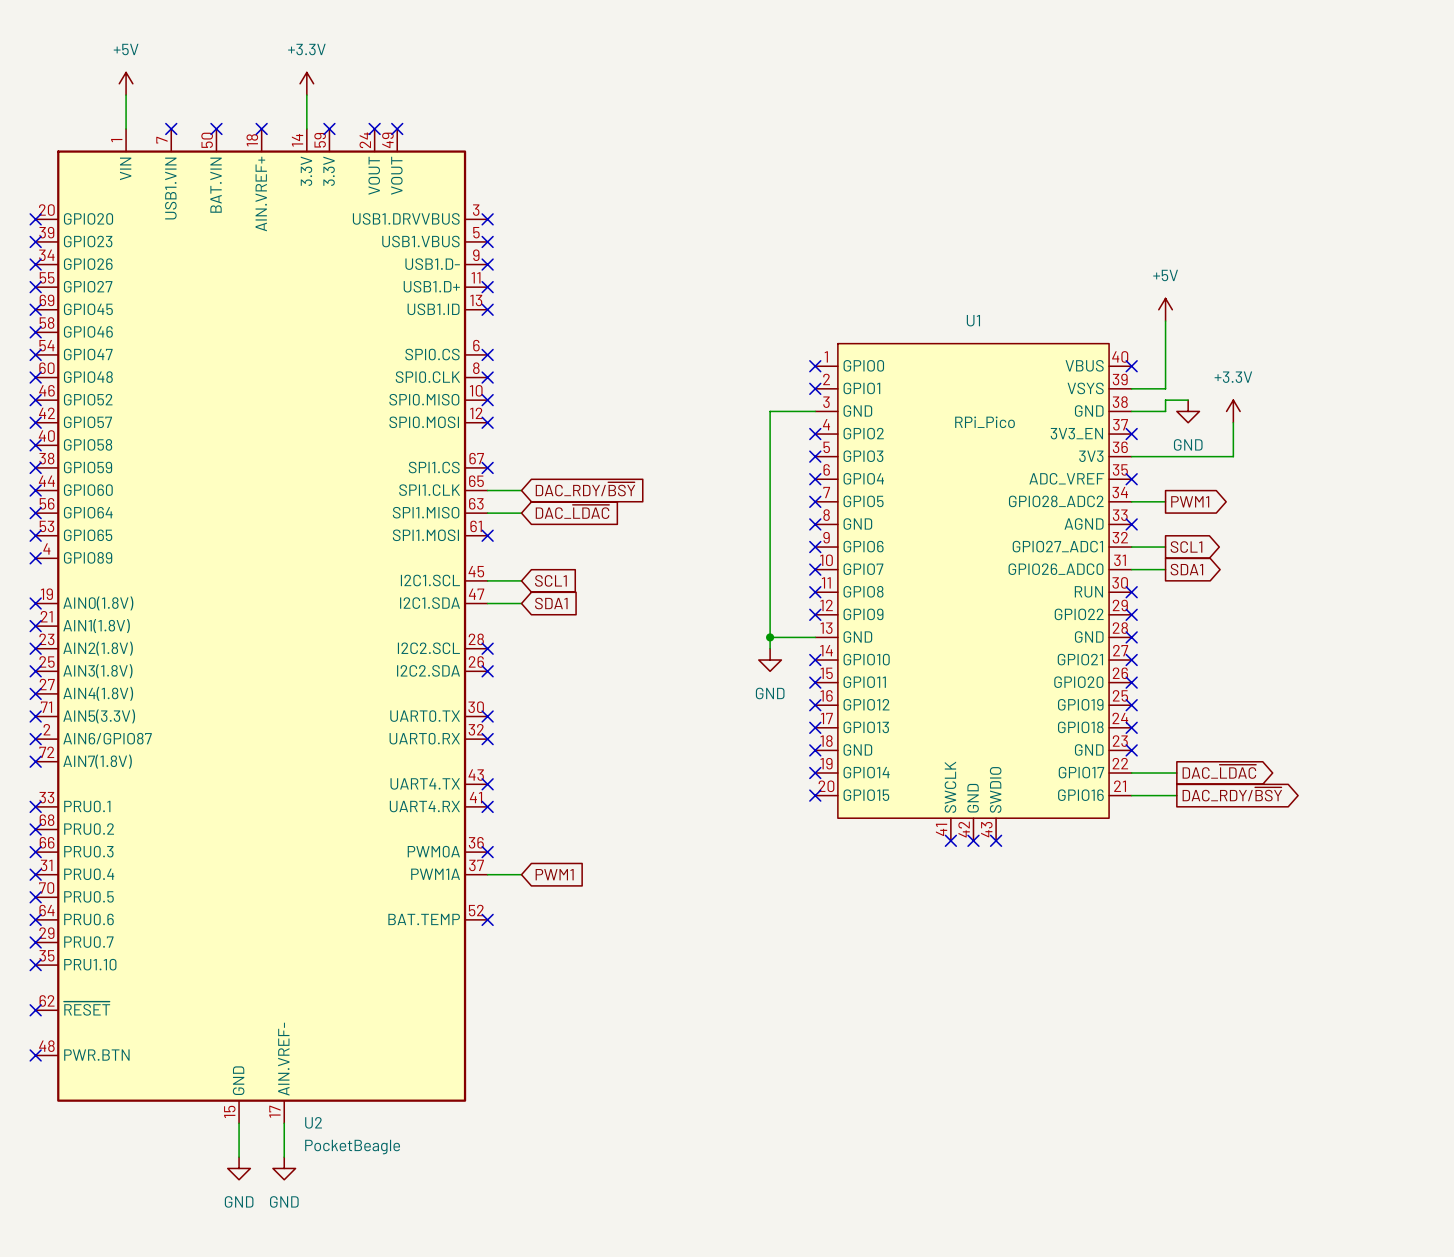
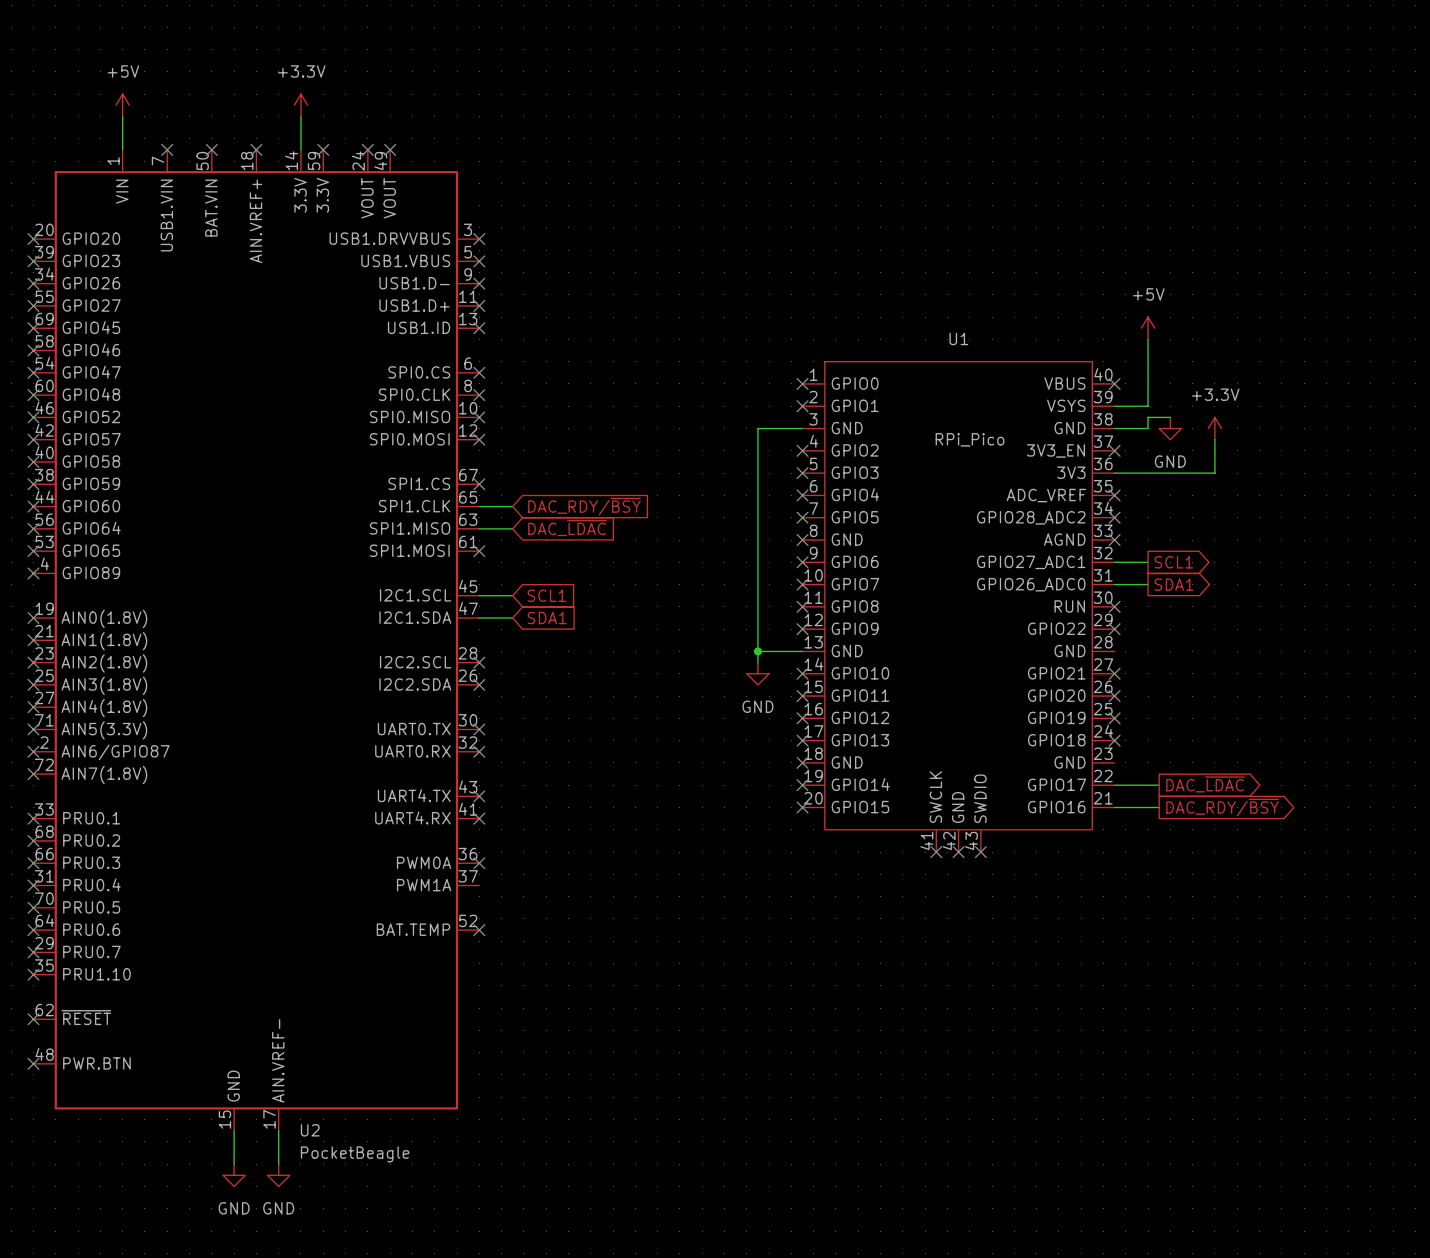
wire: (1131, 501) (1165, 501) -> none
no-connect mark: none -> (1114, 517)
global label: PWM1 (1190, 501) -> none
no-connect mark: (1131, 637) -> none
no-connect mark: (1131, 750) -> none
wire: (487, 874) (521, 874) -> none
global label: PWM1 (554, 874) -> none

